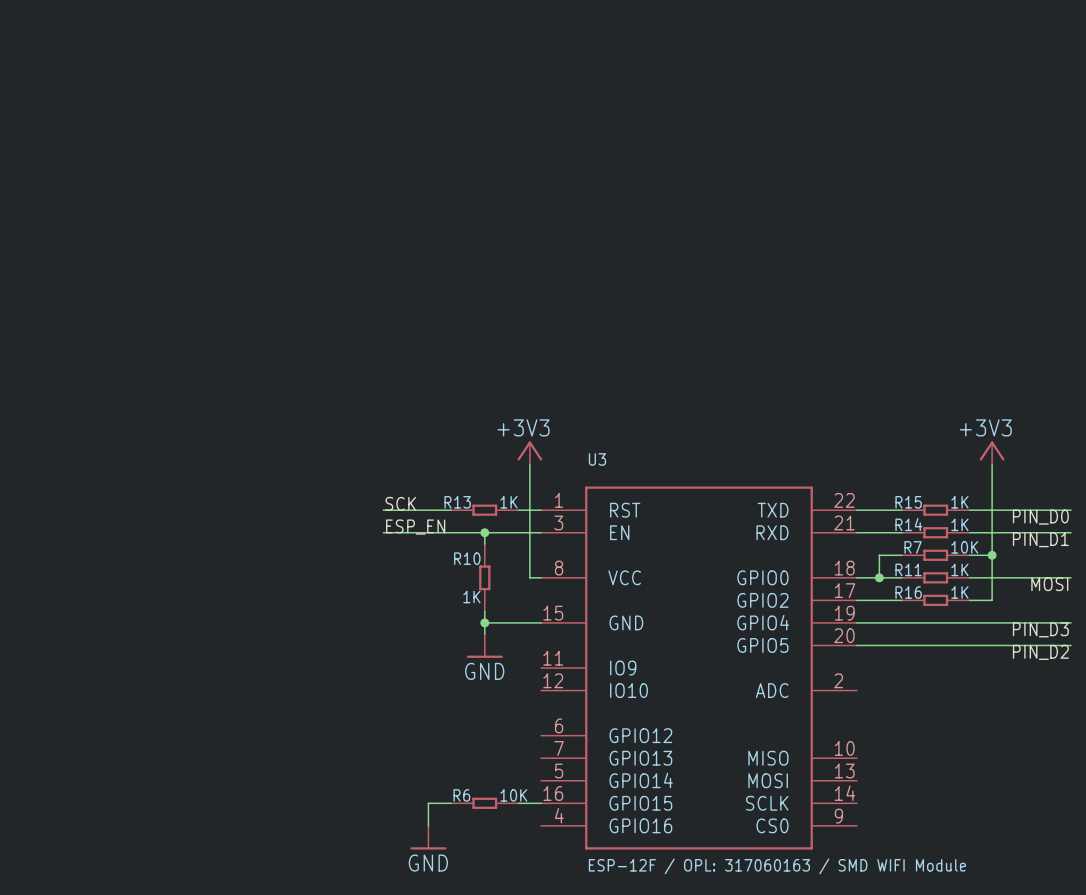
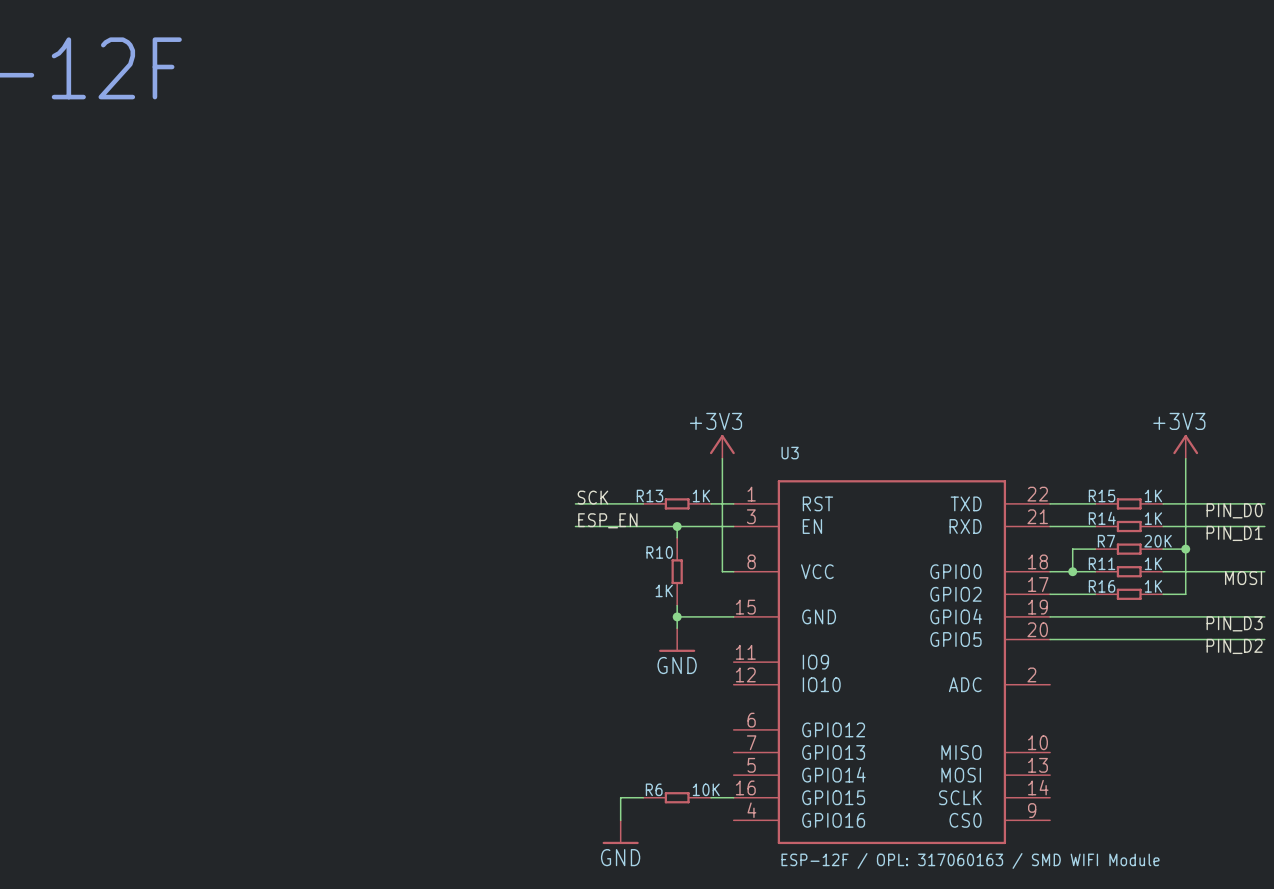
R7 value: 10K (964, 547) -> 20K (1158, 541)

